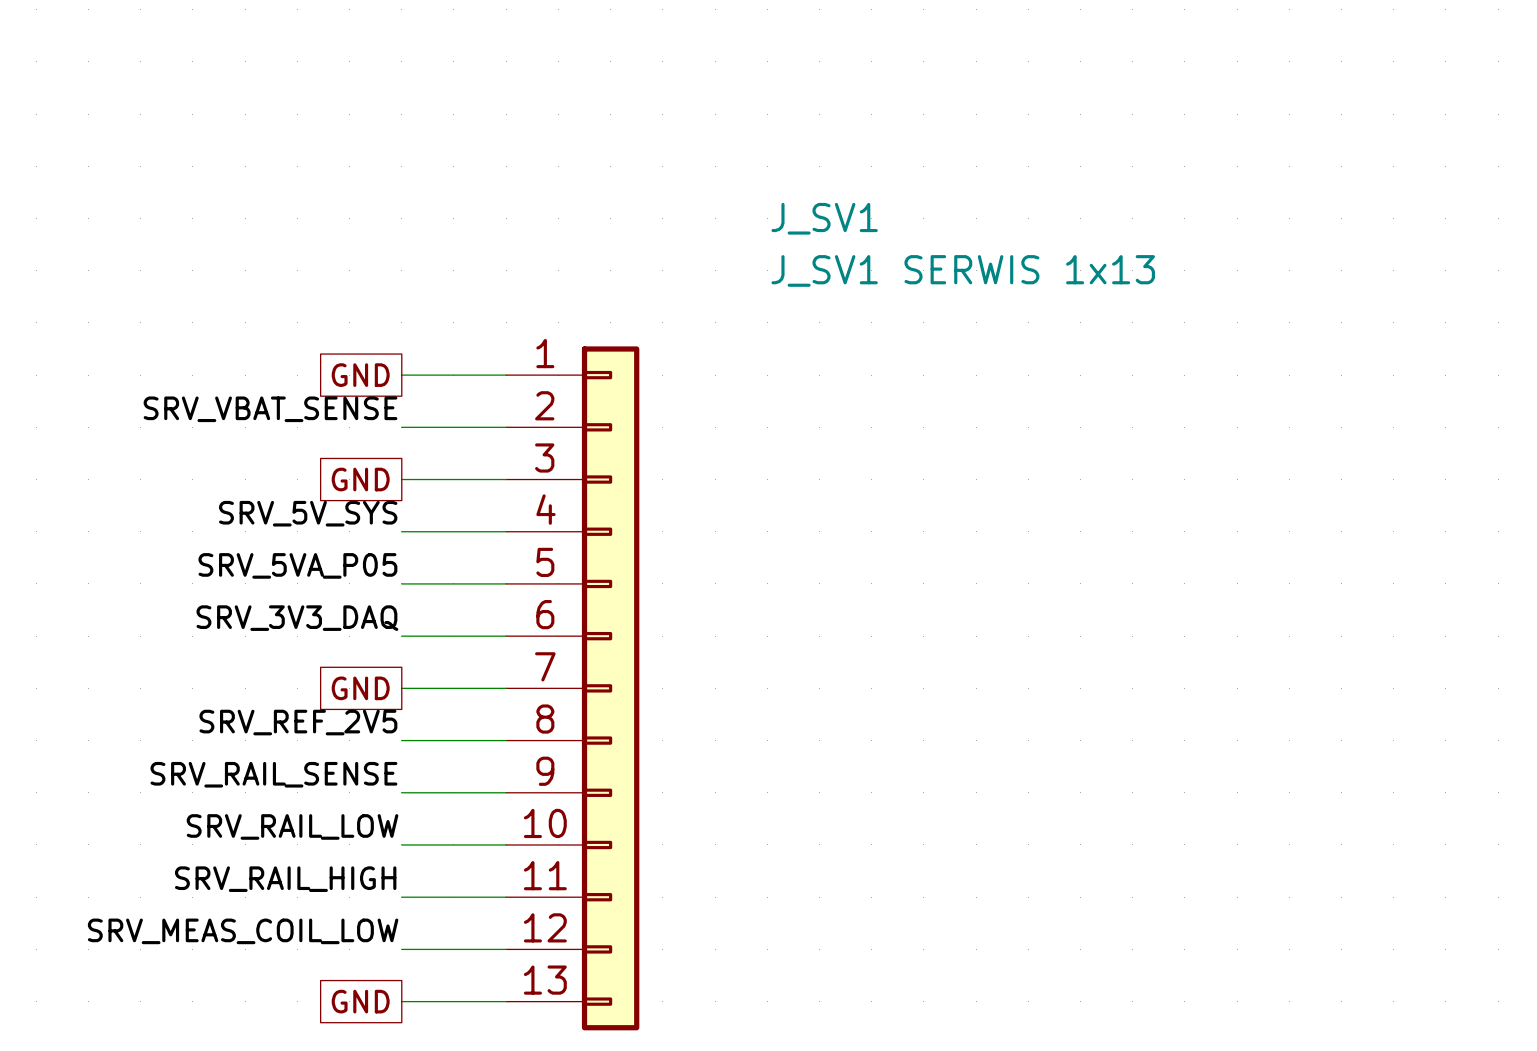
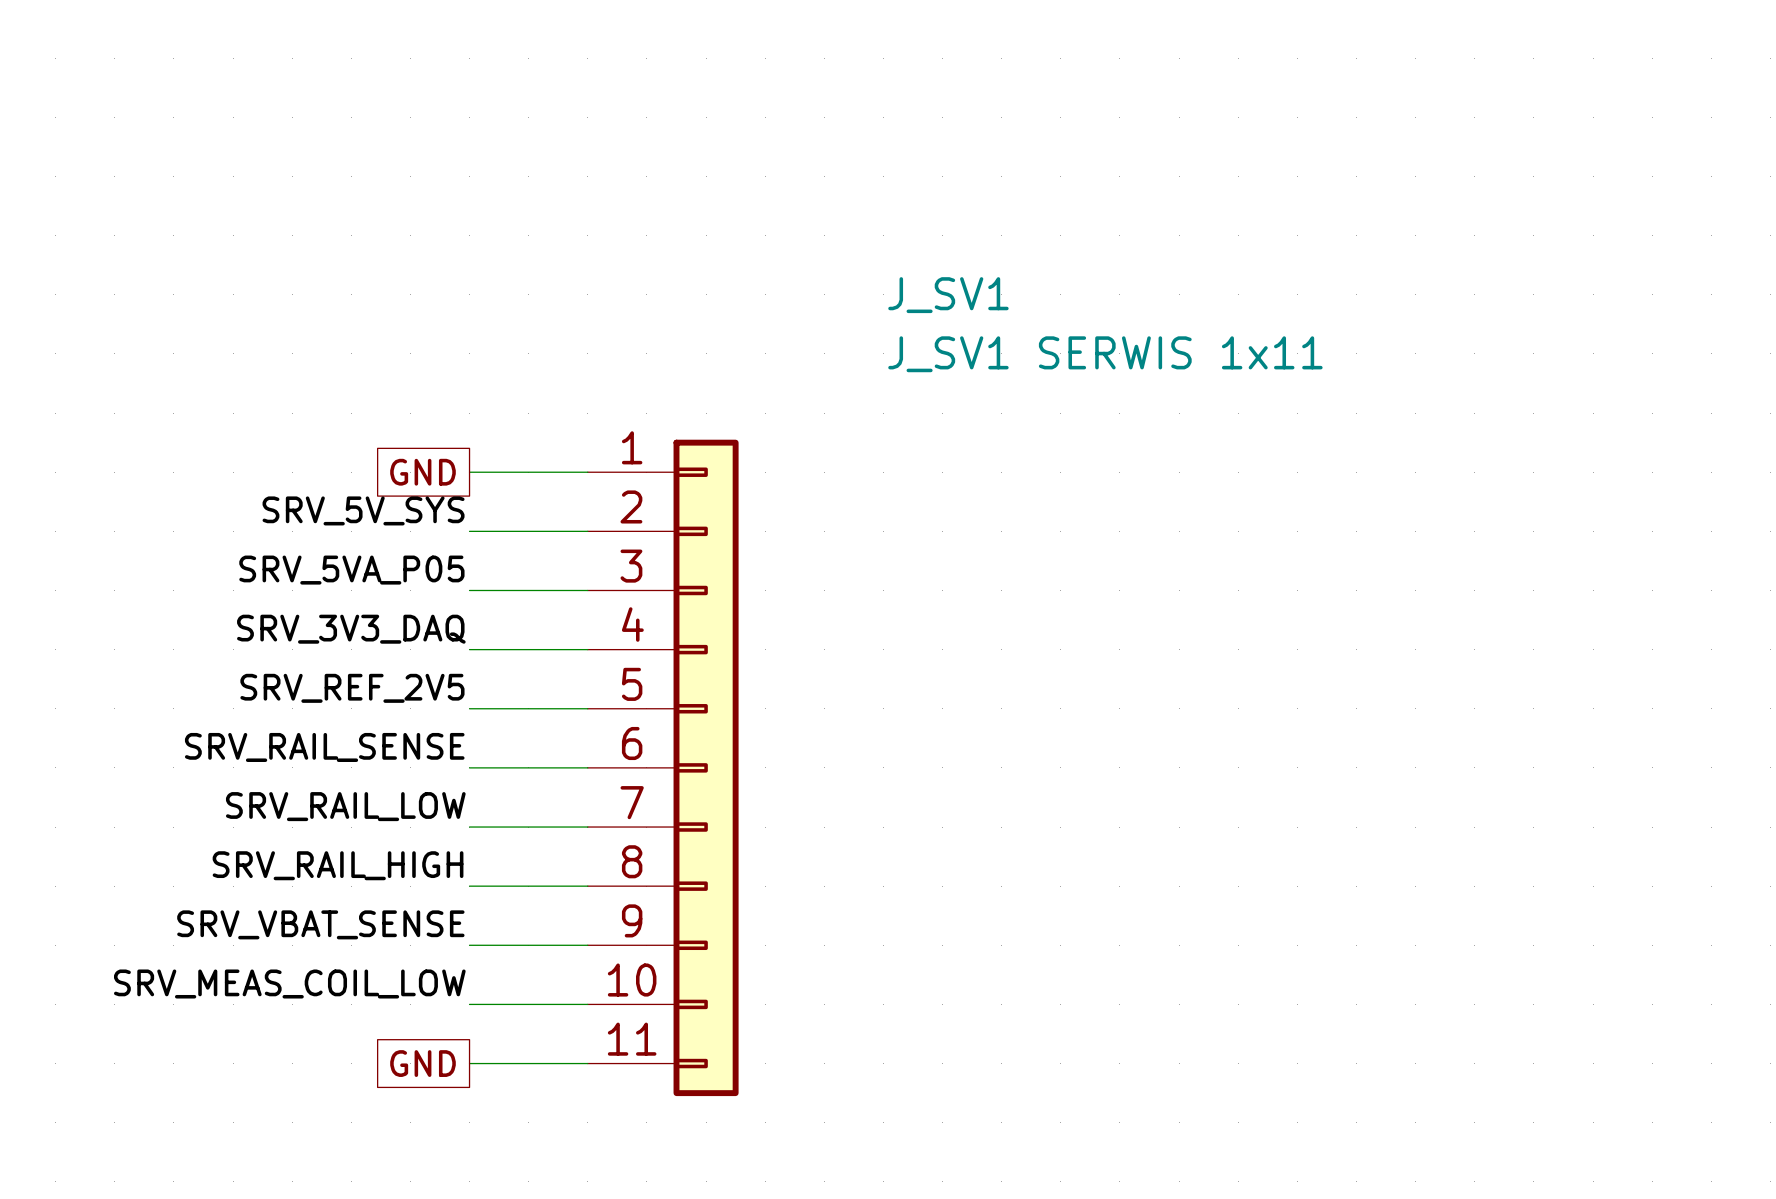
J_SV1 name position: J_SV1 (824, 218) -> J_SV1 (948, 295)
J_SV1 value: J_SV1 SERWIS 1x13 (963, 270) -> J_SV1 SERWIS 1x11 (1105, 354)
J_SV1 symbol: [506, 346, 640, 1031] -> [587, 439, 739, 1097]
global label: GND (360, 375) -> none
wire: (401, 375) (506, 375) -> none
label: SRV_VBAT_SENSE (270, 409) -> none
global label: none -> GND (422, 472)
label: none -> SRV_5V_SYS (363, 510)
global label: GND (360, 479) -> none
label: SRV_5V_SYS (308, 513) -> SRV_5VA_P05 (351, 570)
label: SRV_5VA_P05 (297, 565) -> SRV_3V3_DAQ (351, 629)
label: SRV_3V3_DAQ (297, 618) -> SRV_REF_2V5 (352, 688)
label: none -> SRV_RAIL_SENSE (324, 747)
global label: GND (360, 688) -> none
label: SRV_REF_2V5 (298, 722) -> SRV_RAIL_LOW (345, 806)
label: SRV_RAIL_SENSE (273, 774) -> SRV_RAIL_HIGH (338, 865)
label: SRV_RAIL_LOW (292, 826) -> SRV_VBAT_SENSE (320, 924)
label: SRV_RAIL_HIGH (285, 879) -> SRV_MEAS_COIL_LOW (289, 984)
label: SRV_MEAS_COIL_LOW (243, 931) -> none
global label position: GND (360, 1001) -> GND (422, 1063)
wire: (401, 1001) (506, 1001) -> none

